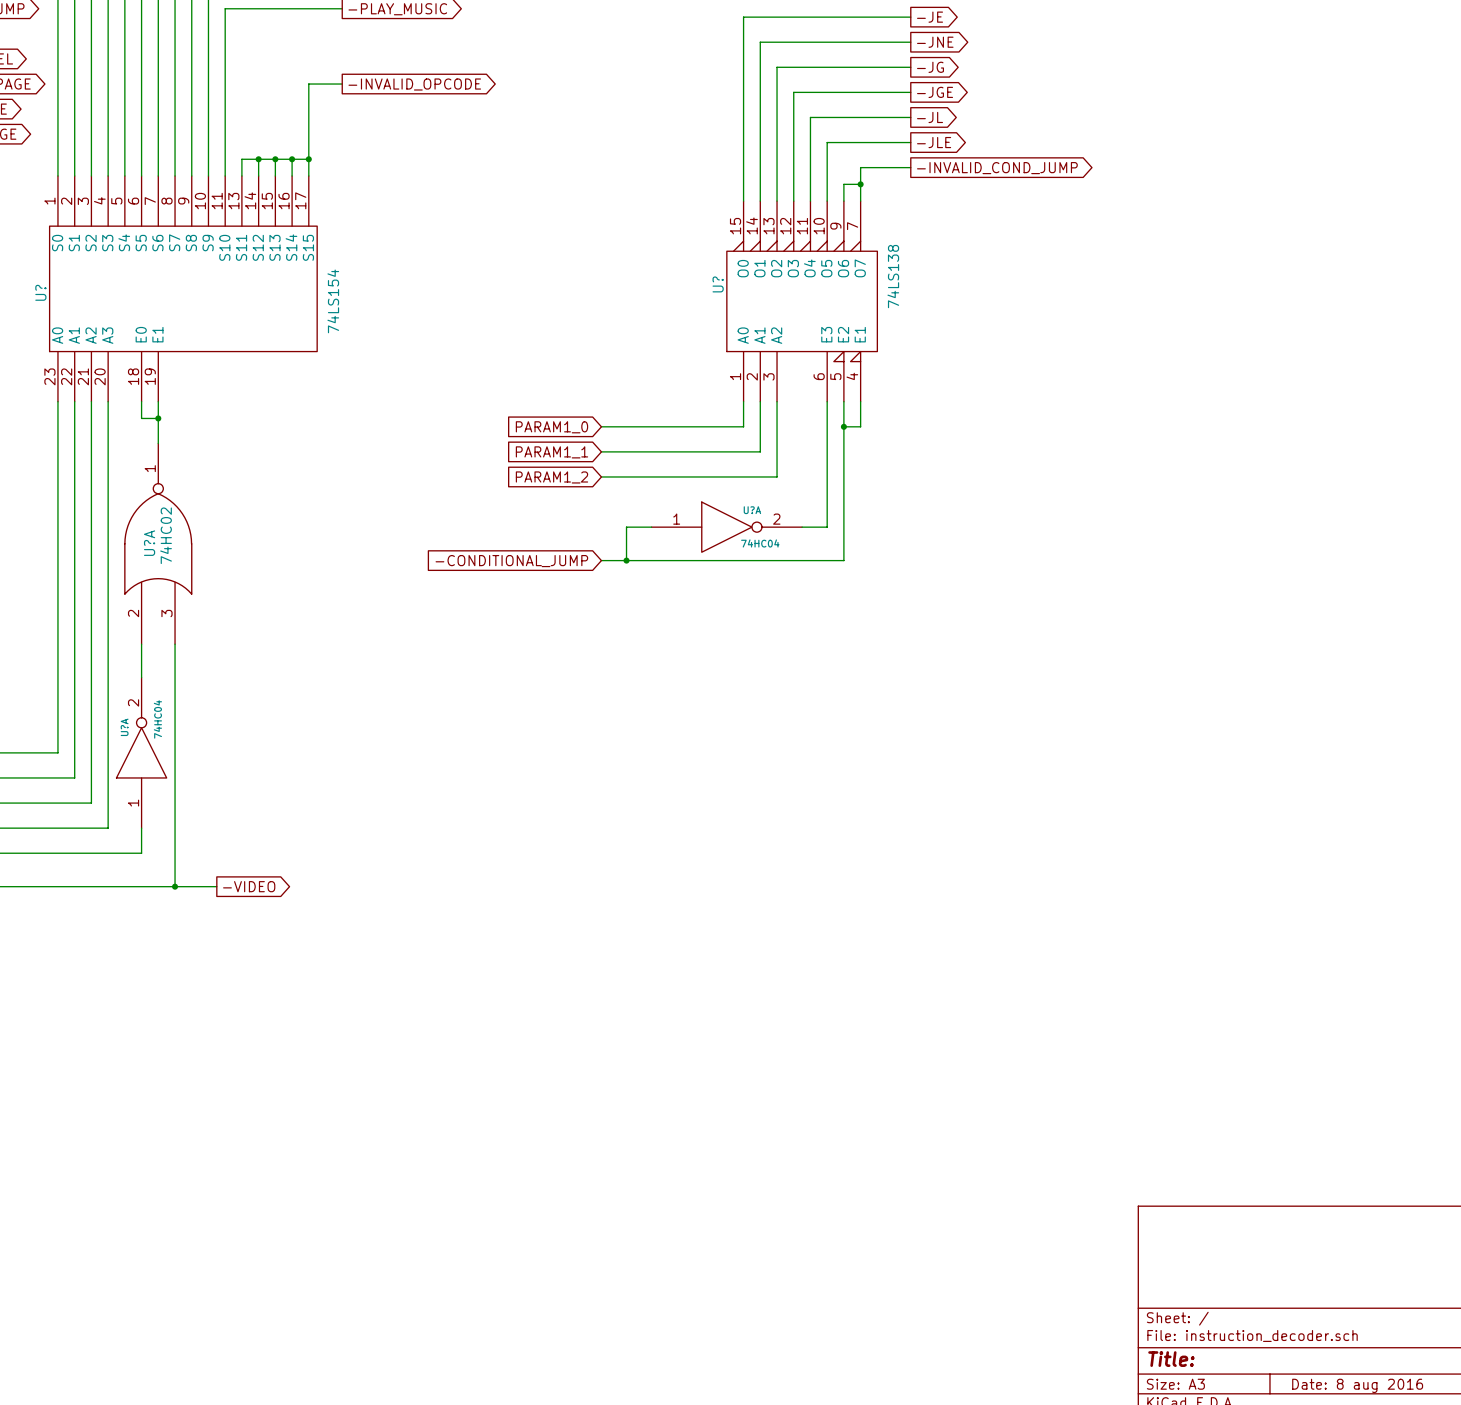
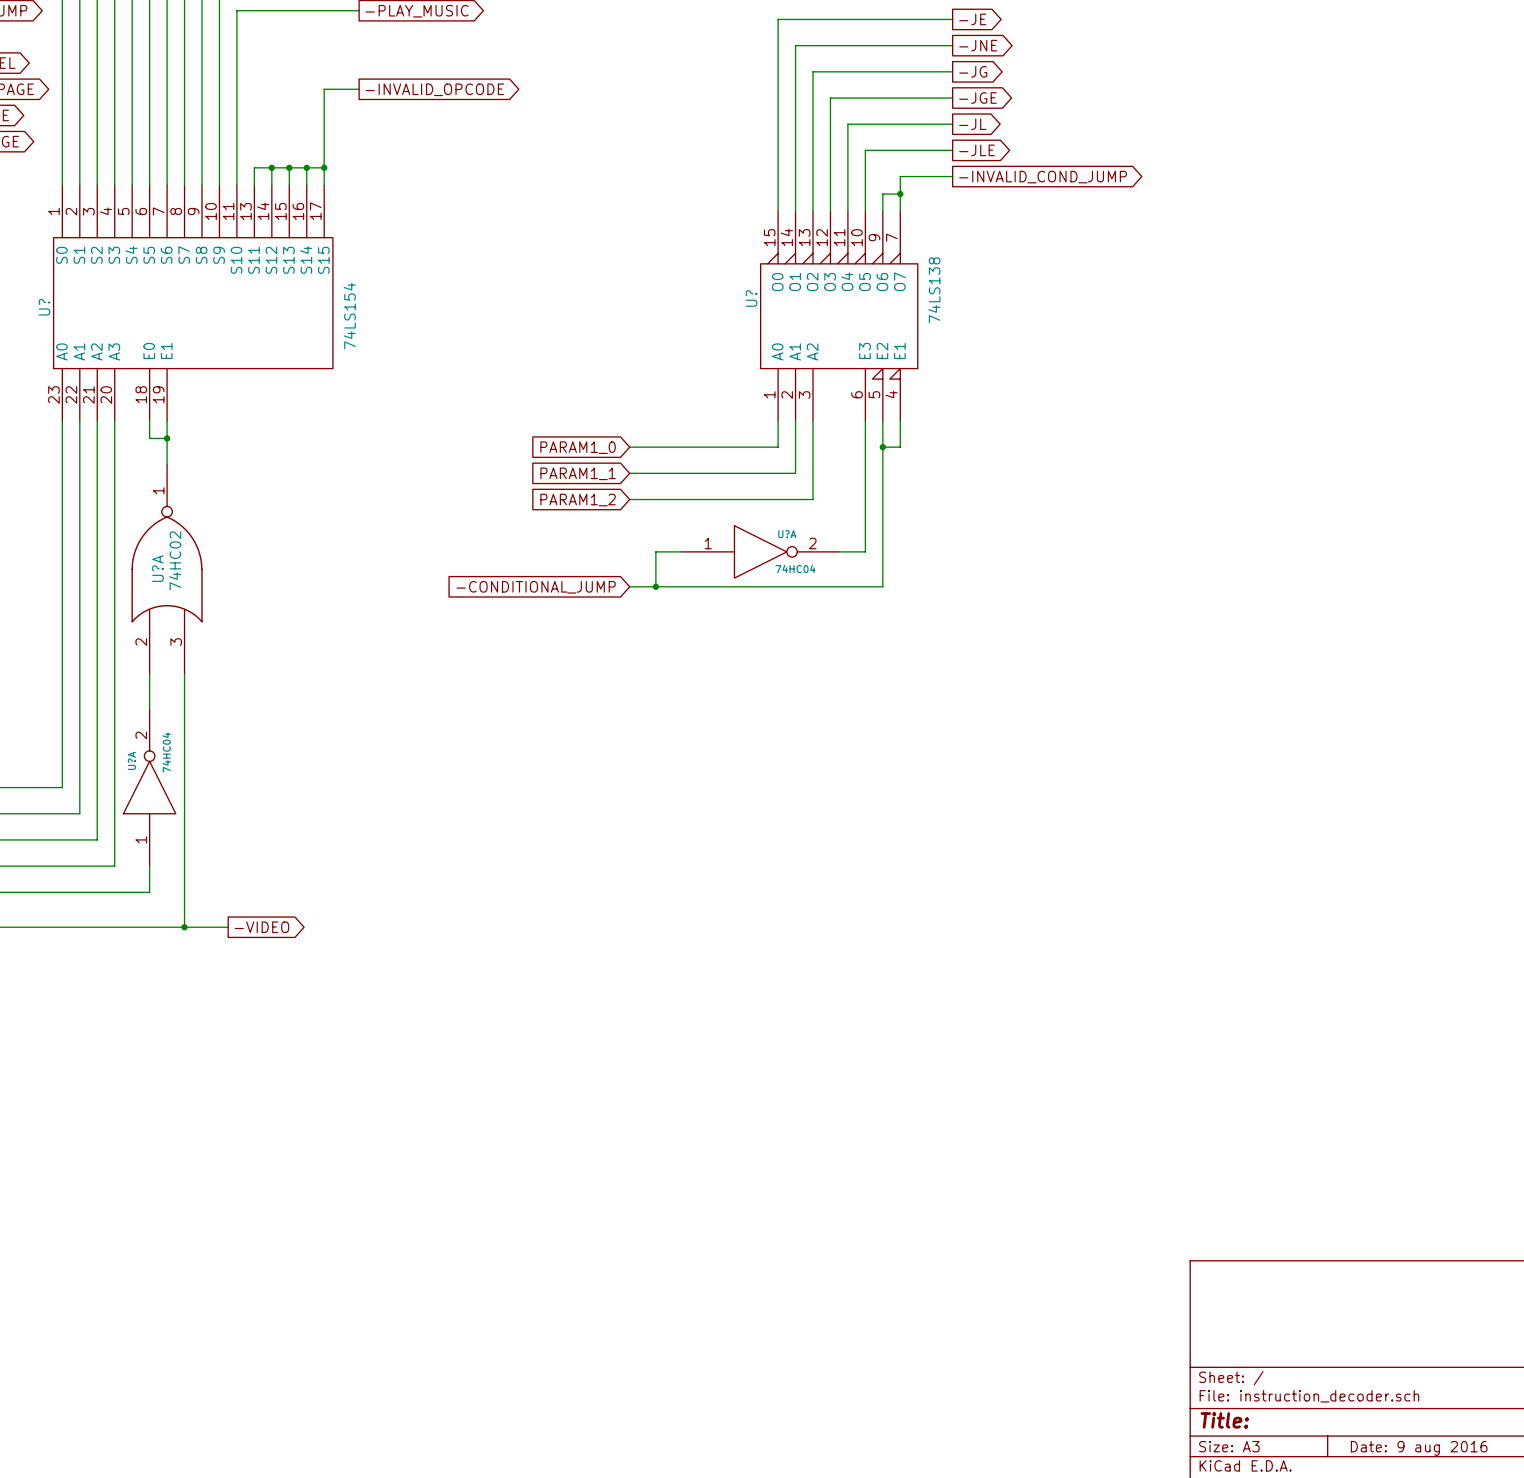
title block: Date: 8 aug 2016 (1357, 1385) -> Date: 9 aug 2016 (1419, 1448)

